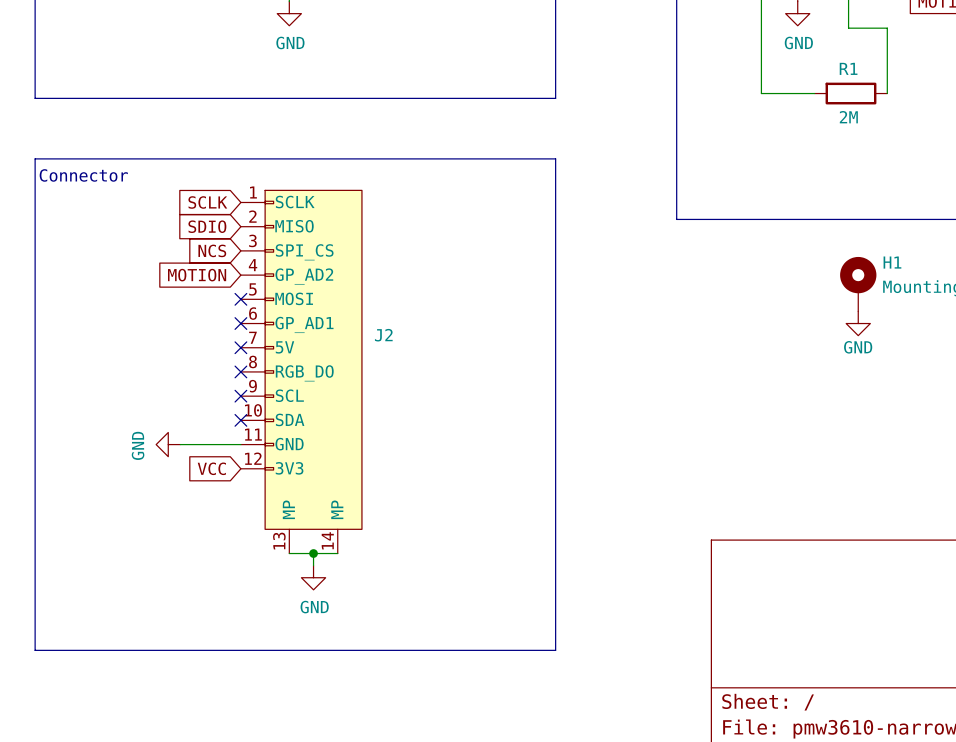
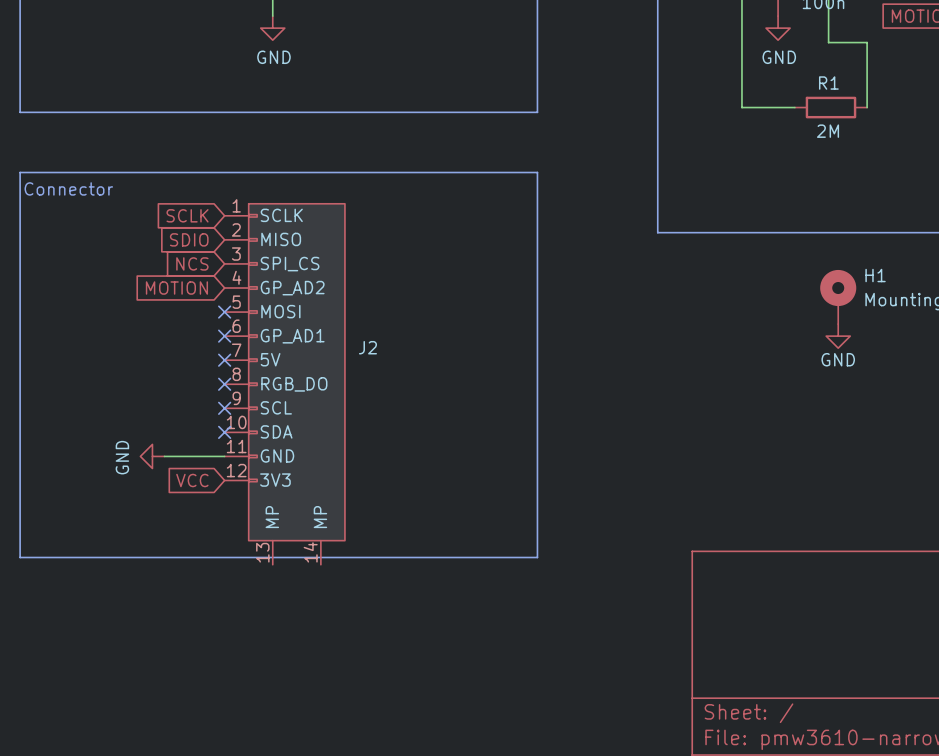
line: (35, 546) (35, 650) (555, 650) (555, 546) -> (20, 557) (537, 557)
wire: (289, 553) (337, 553) -> none
wire: (313, 553) (313, 565) -> none
junction: (313, 553) -> none
power symbol: GND (313, 577) -> none

